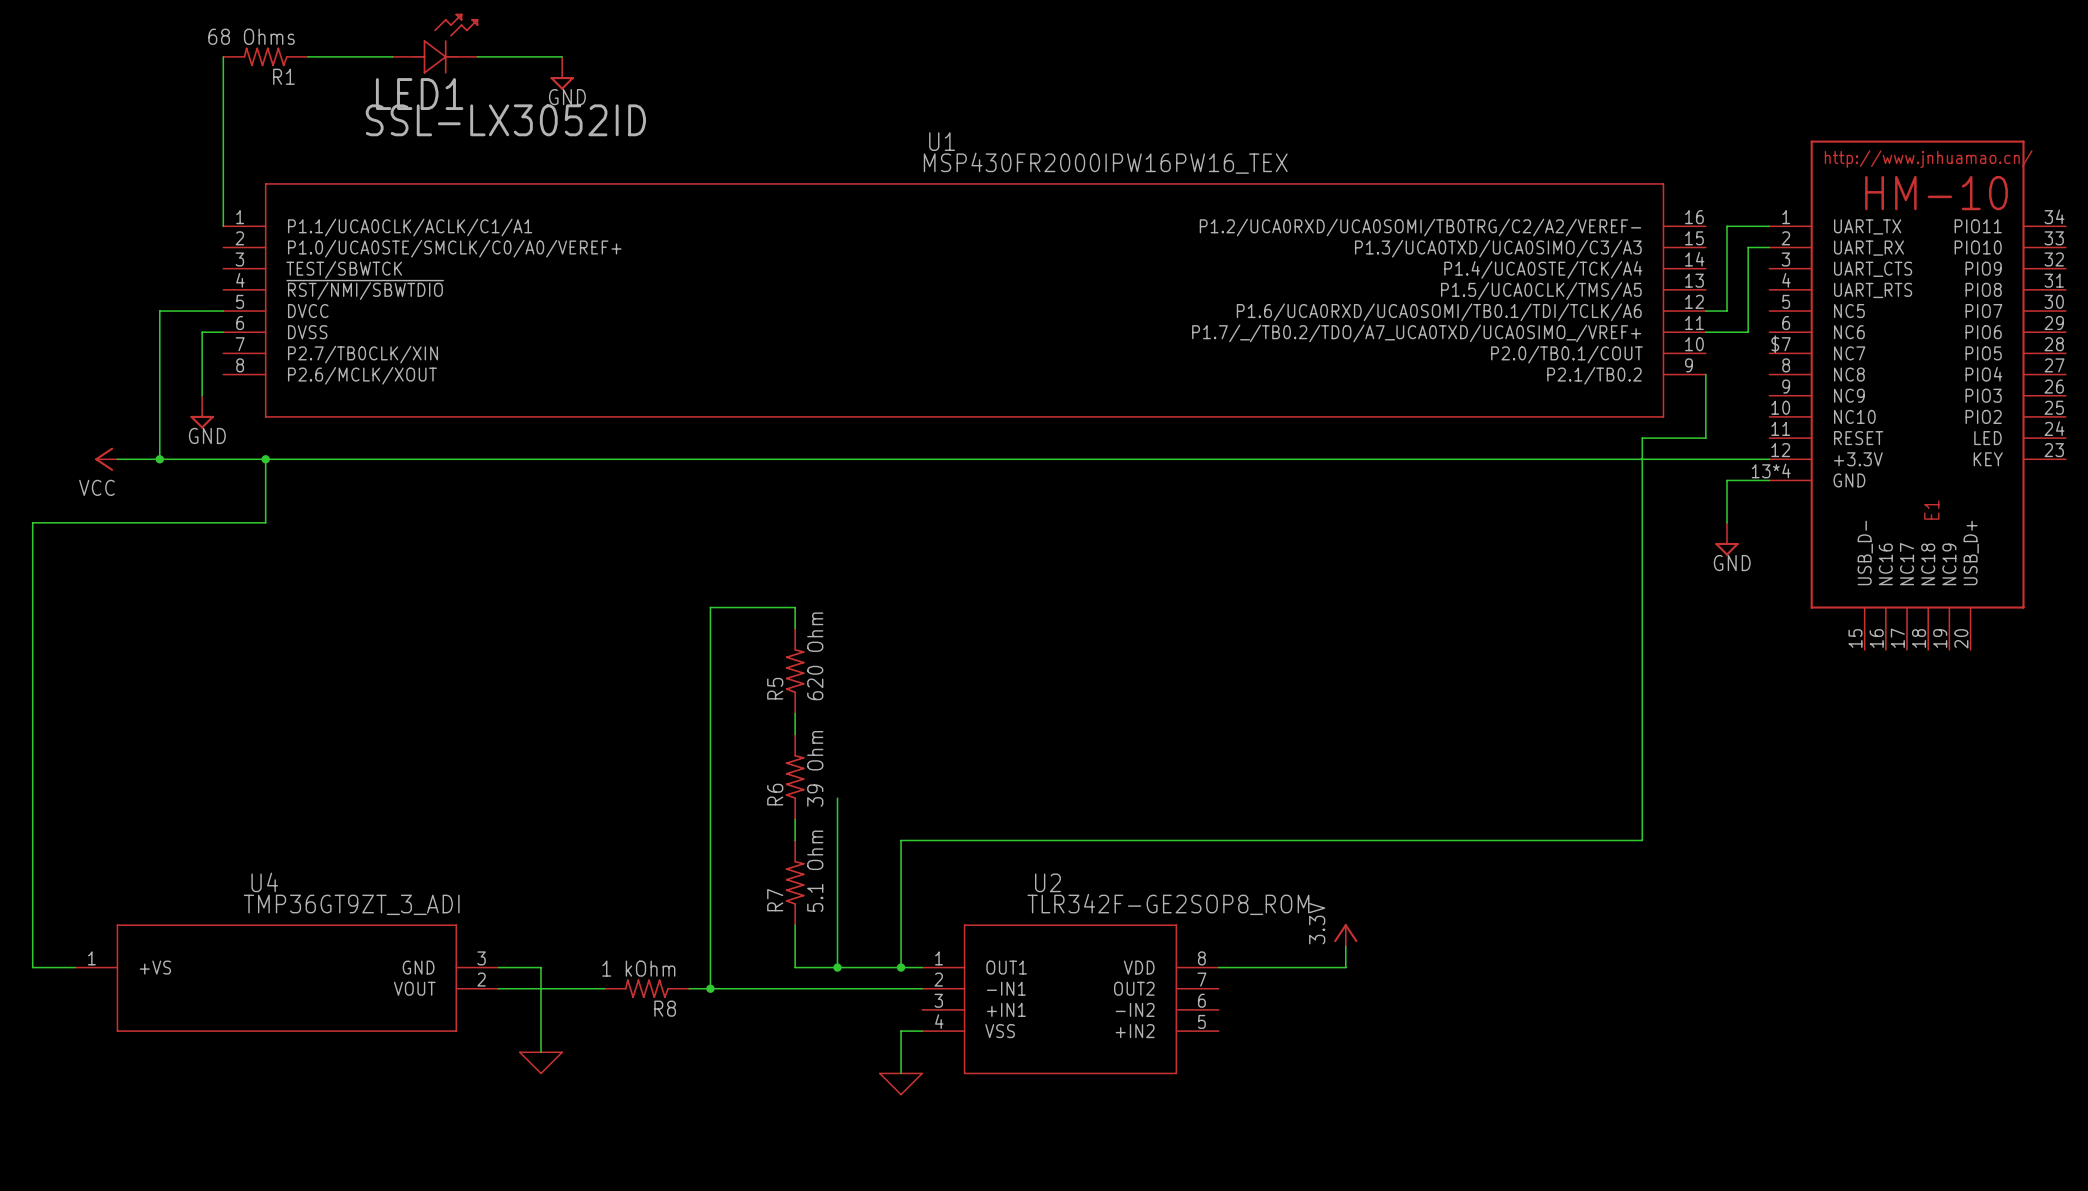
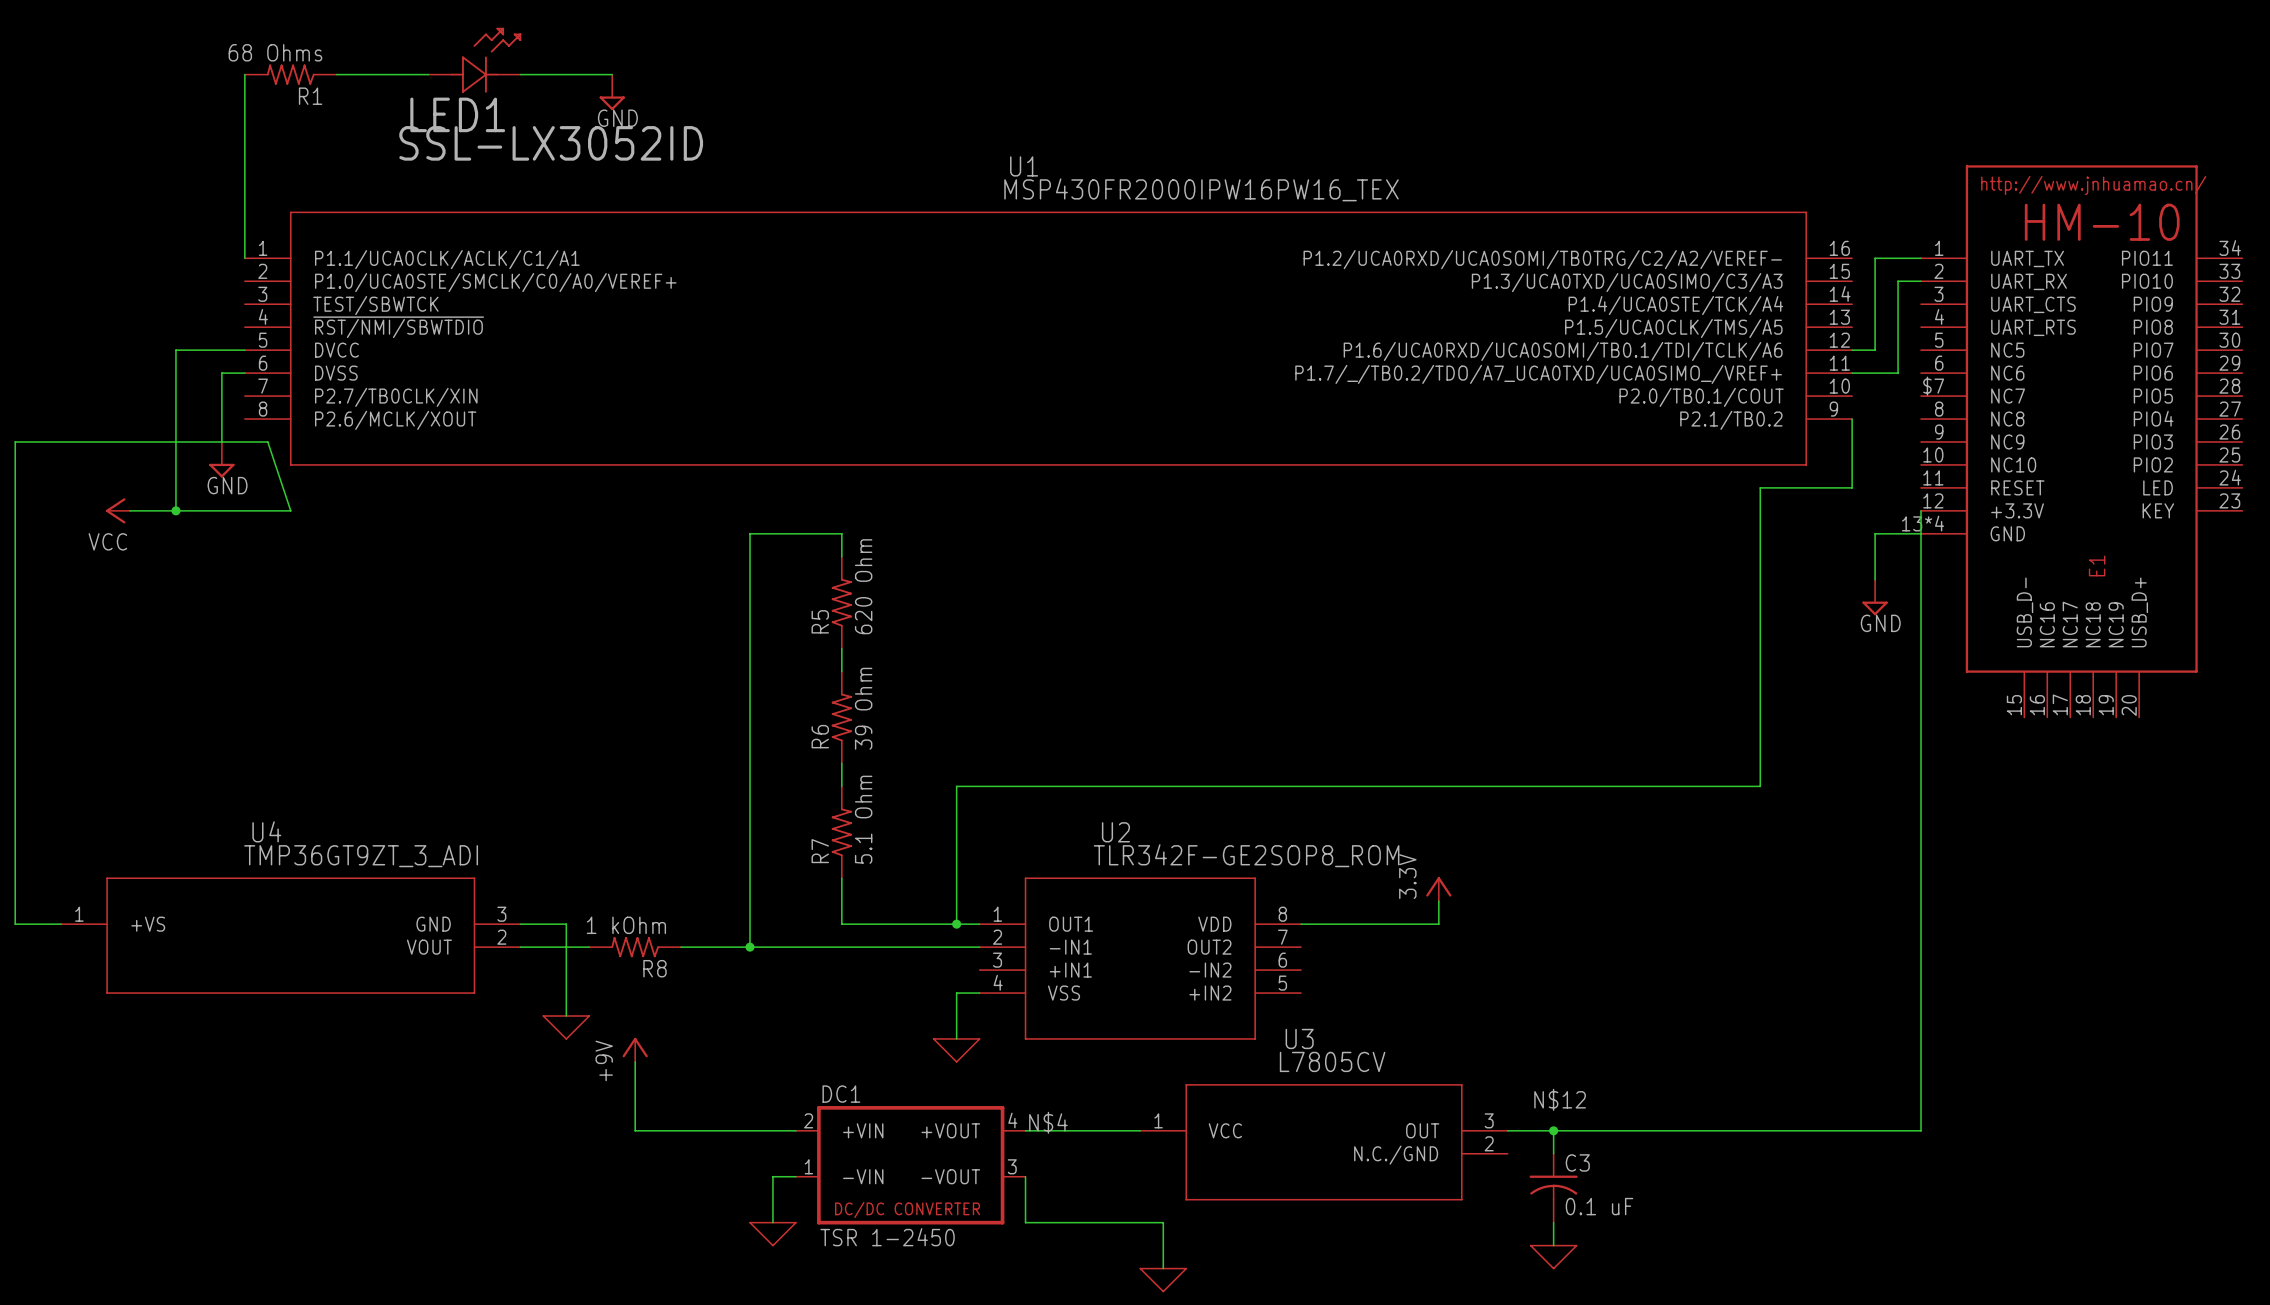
wire: (1642, 438) (1642, 840) (1324, 840) -> (1783, 487) (1760, 487) (1760, 786) (956, 786) (956, 924)
wire: none -> (290, 510) (267, 441) (15, 441) (15, 924) (61, 924)
junction: (265, 459) -> none
wire: (1769, 459) (265, 459) (265, 522) (32, 522) (32, 967) (75, 967) -> (1921, 510) (1921, 1130) (1507, 1130)
wire: (795, 628) (795, 607) (710, 607) (710, 988) -> (841, 556) (841, 533) (749, 533) (749, 947)
R5 position: (795, 671) -> (841, 602)
wire: (795, 713) (795, 734) -> (841, 648) (841, 671)
R6 position: (795, 776) -> (841, 717)
wire: (837, 798) (837, 967) -> none
wire: (795, 819) (795, 840) -> (841, 763) (841, 786)
wire: none -> (1438, 901) (1438, 924)
junction: none -> (956, 924)
wire: (1197, 840) (901, 840) (901, 967) -> none
wire: none -> (520, 947) (589, 947)
wire: none -> (681, 947) (979, 947)
junction: none -> (749, 947)
R7 position: (795, 882) -> (841, 832)
wire: (795, 925) (795, 967) (922, 967) -> (841, 878) (841, 924) (979, 924)
power symbol: none -> (566, 1027)
power symbol position: 3.3V (1345, 935) -> 3.3V (1438, 889)
wire: (1345, 946) (1345, 967) (1218, 967) -> none
power symbol: none -> +9V (635, 1049)
power symbol: none -> (956, 1050)
wire: (498, 967) (541, 967) (541, 1052) -> (520, 924) (566, 924) (566, 1016)
wire: none -> (635, 1061) (635, 1130) (795, 1130)
junction: (837, 967) -> none
junction: (901, 967) -> none
U4 position: (286, 978) -> (290, 935)
wire: (498, 988) (604, 988) -> none
R8 position: (646, 988) -> (635, 947)
wire: (689, 988) (922, 988) -> none
junction: (710, 988) -> none
U2 position: (1070, 999) -> (1140, 958)
label: none -> N$12 (1560, 1099)
label: none -> N$4 (1048, 1122)
wire: (922, 1031) (901, 1031) (901, 1073) -> (979, 993) (956, 993) (956, 1038)
wire: none -> (1025, 1130) (1140, 1130)
wire: none -> (1553, 1130) (1553, 1153)
junction: none -> (1553, 1130)
U3: none -> L7805CV (1324, 1142)
power symbol: (541, 1062) -> none
DC1: none -> TSR 1-2450 (910, 1165)
wire: none -> (795, 1176) (772, 1176) (772, 1222)
wire: none -> (1025, 1176) (1025, 1222) (1163, 1222) (1163, 1268)
power symbol: (901, 1084) -> none
C3: none -> 0.1 uF (1553, 1188)
wire: none -> (1553, 1222) (1553, 1245)
power symbol: none -> (772, 1234)
power symbol: none -> (1553, 1257)
power symbol: none -> (1163, 1280)

